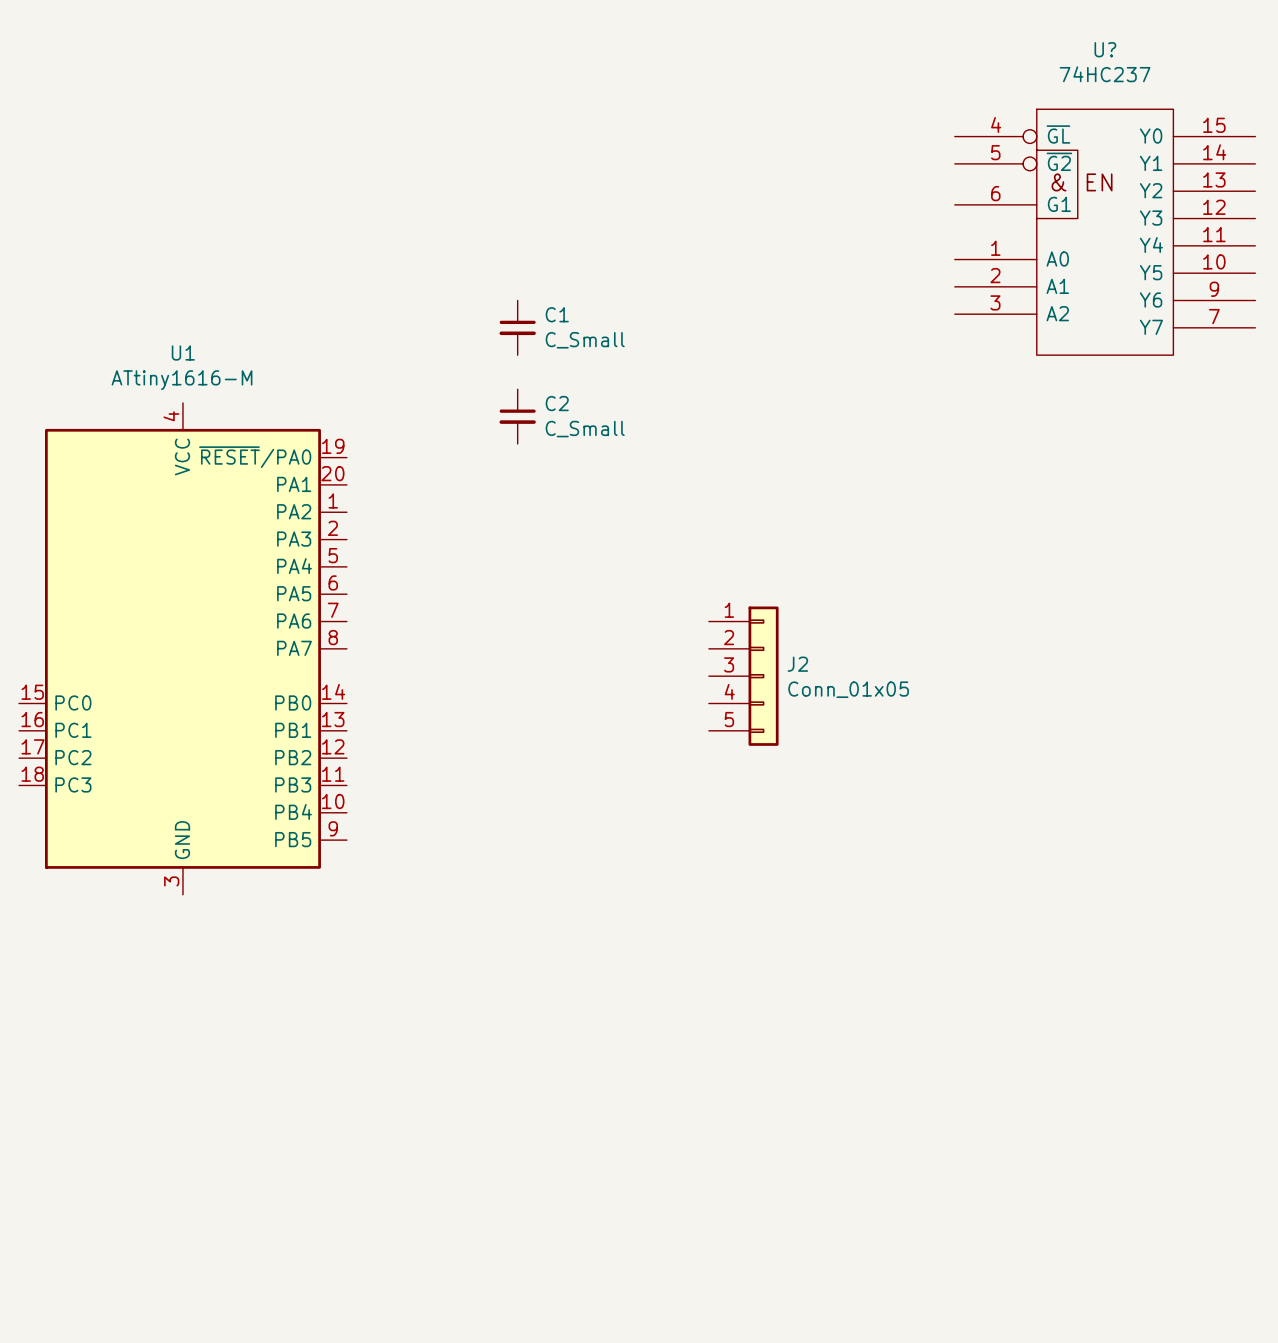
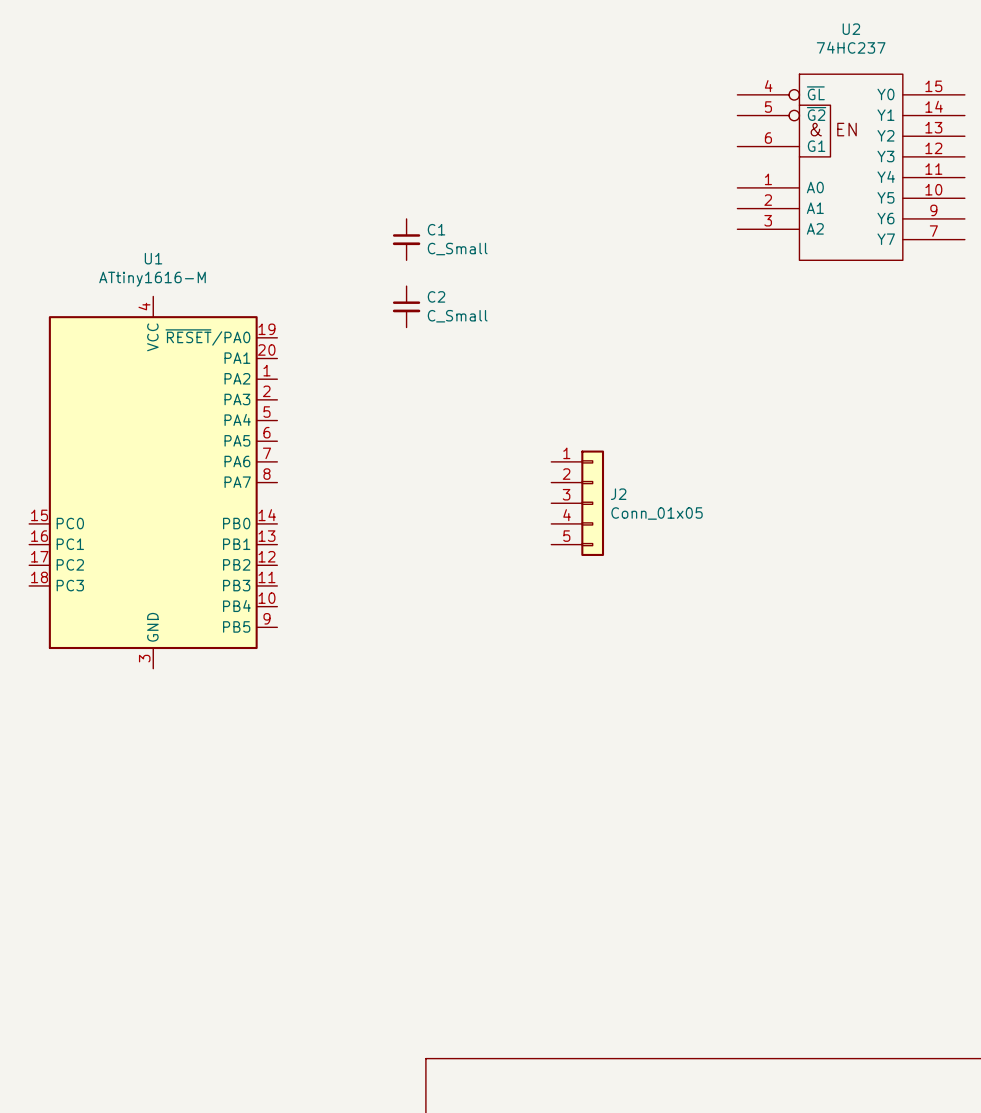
U? name: U? (1105, 49) -> U2 (851, 29)

